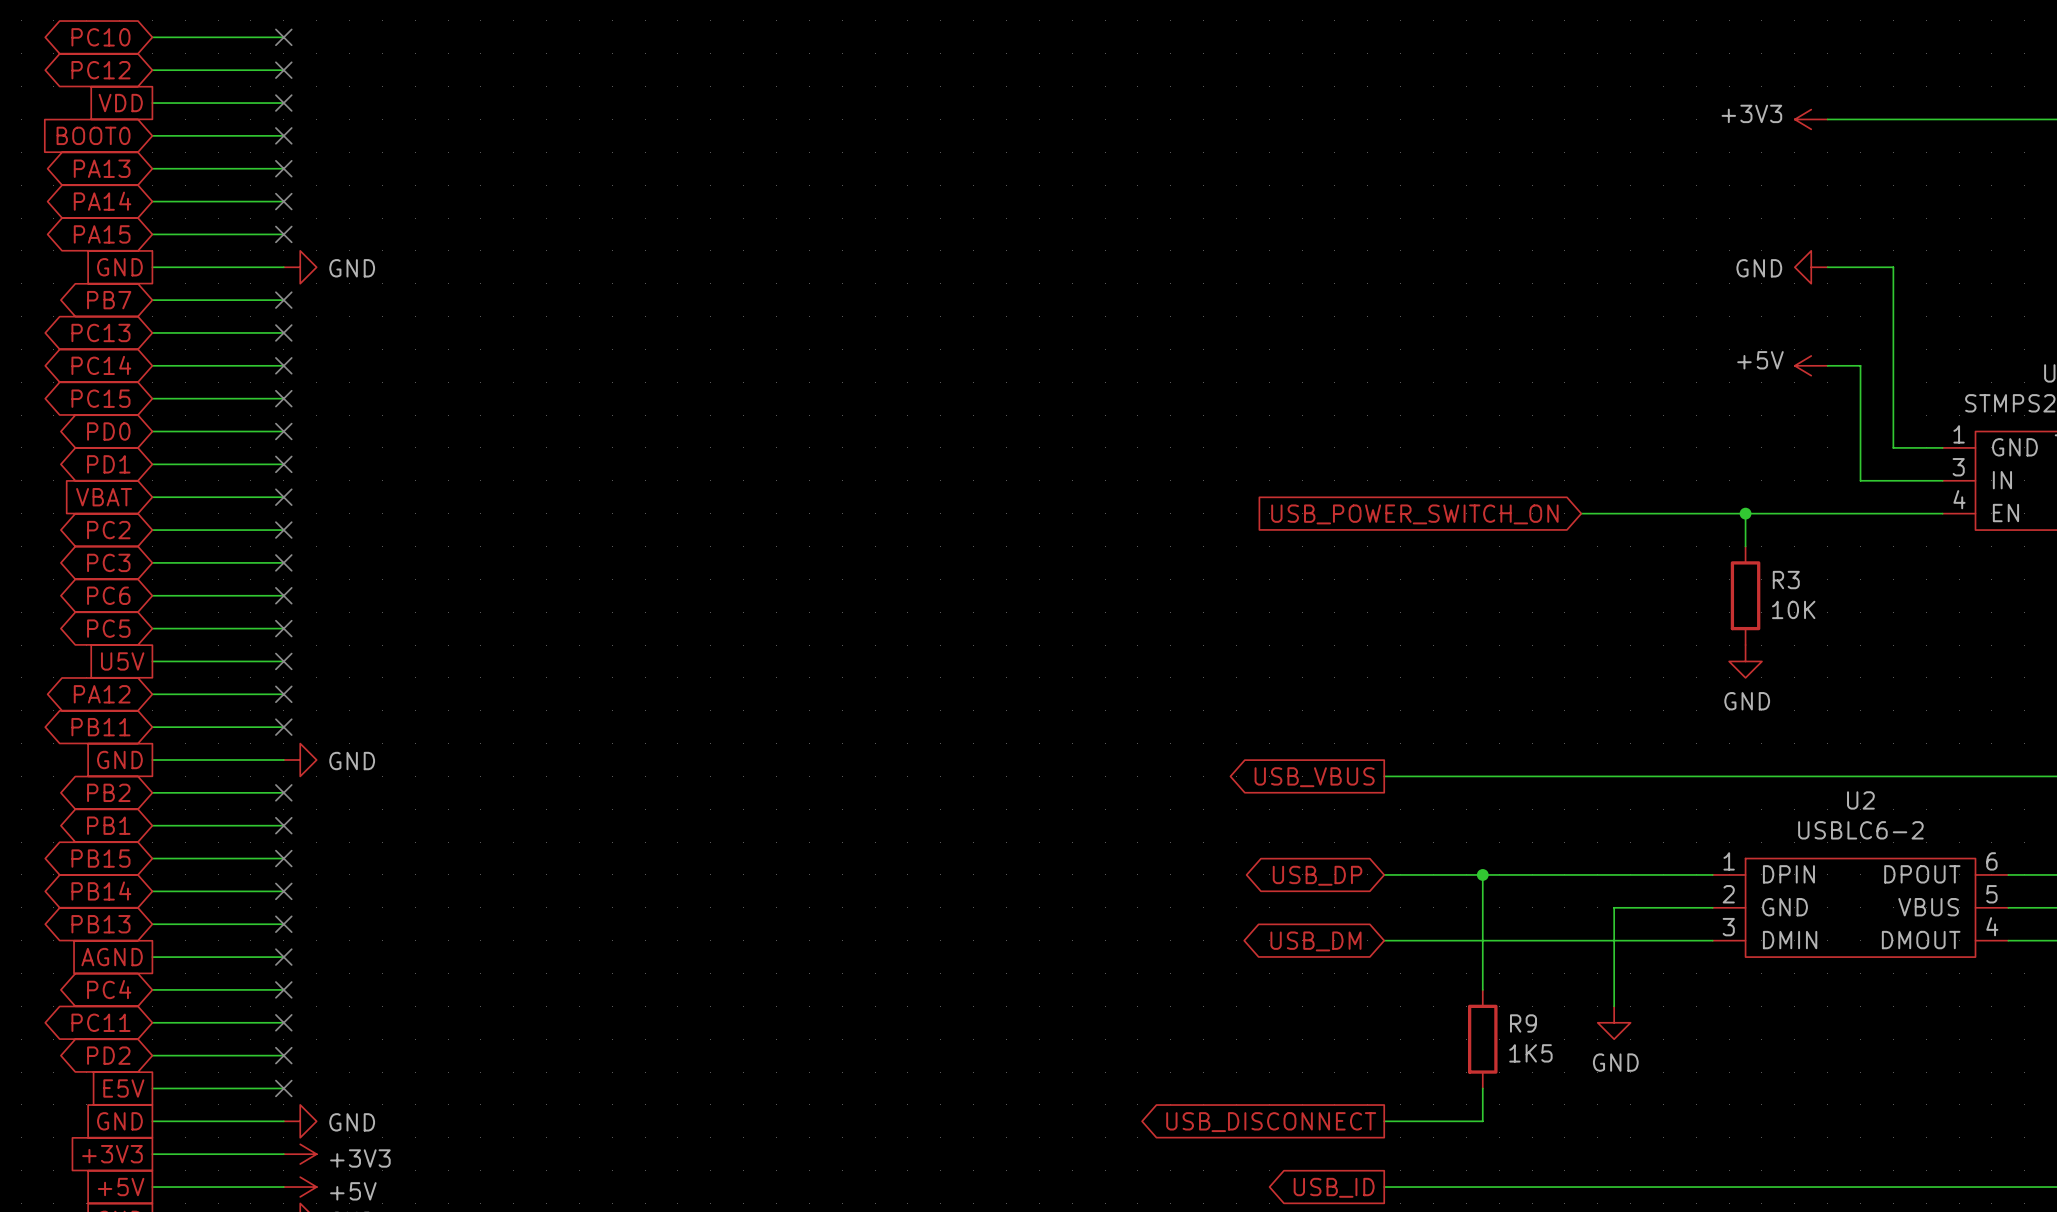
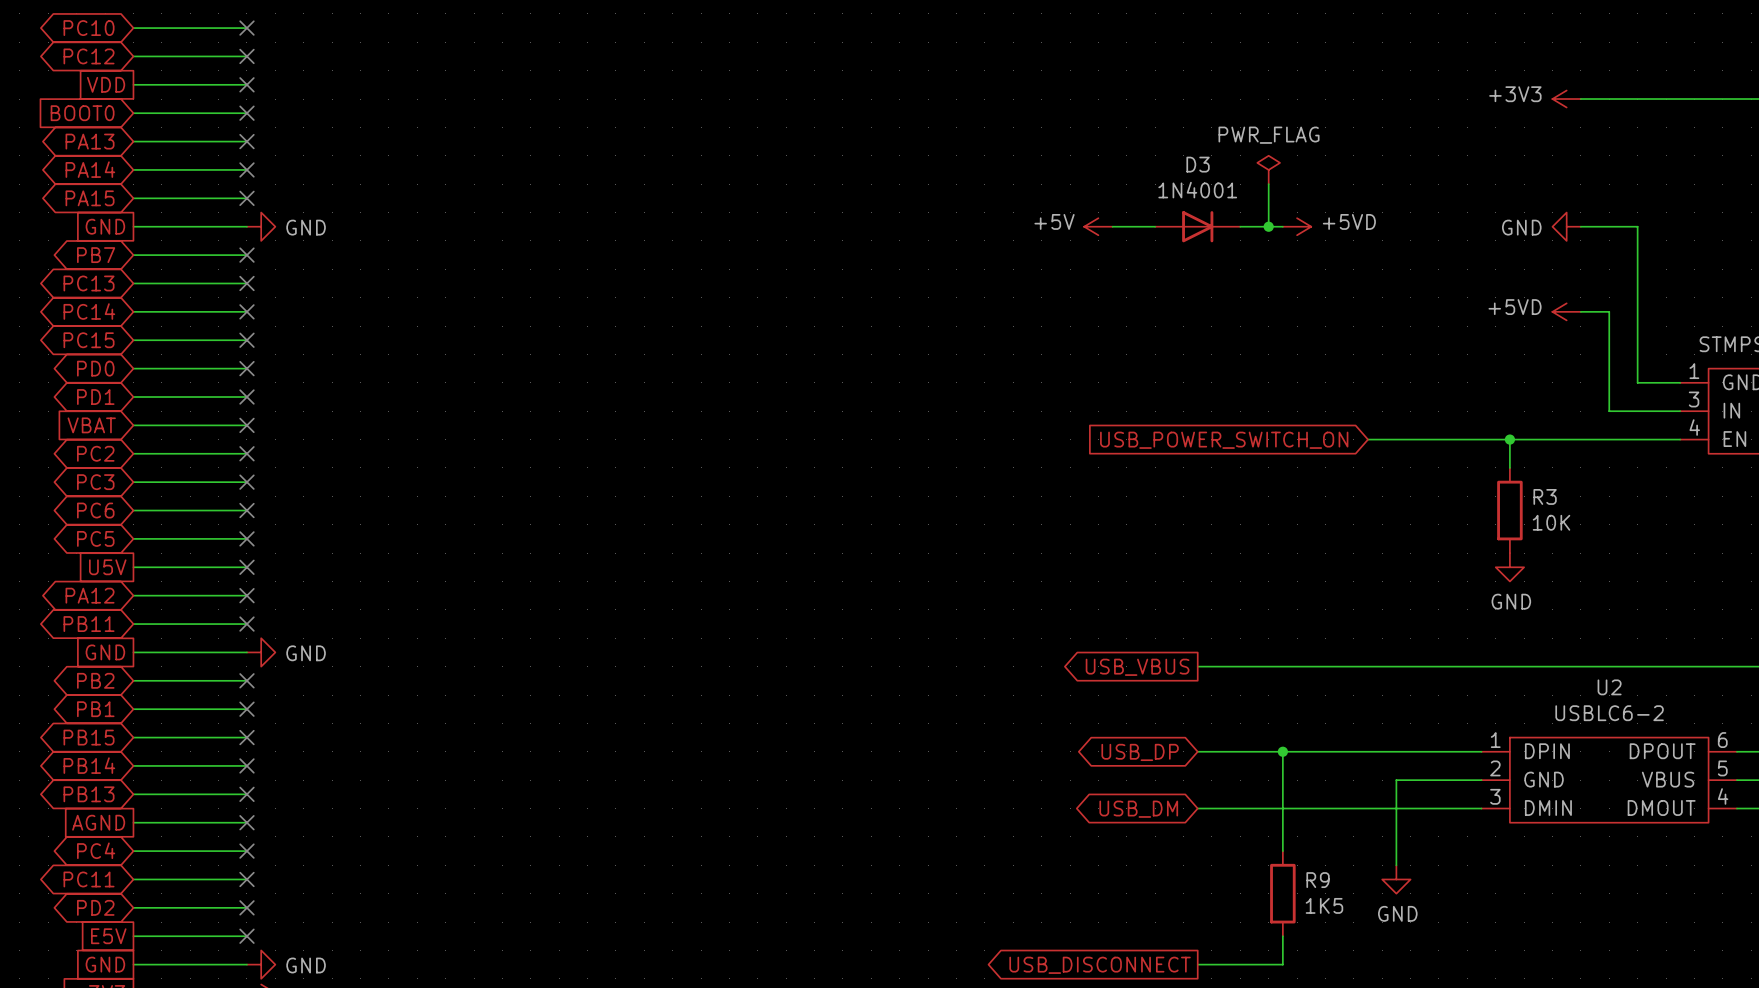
power symbol: none -> PWR_FLAG (1268, 169)
wire: none -> (1268, 184) (1268, 226)
power symbol: none -> +5V (1098, 226)
wire: none -> (1112, 226) (1155, 226)
D3: none -> 1N4001 (1197, 226)
wire: none -> (1240, 226) (1282, 226)
junction: none -> (1268, 226)
power symbol: none -> +5VD (1297, 226)
power symbol: +5V (1811, 365) -> +5VD (1566, 311)

